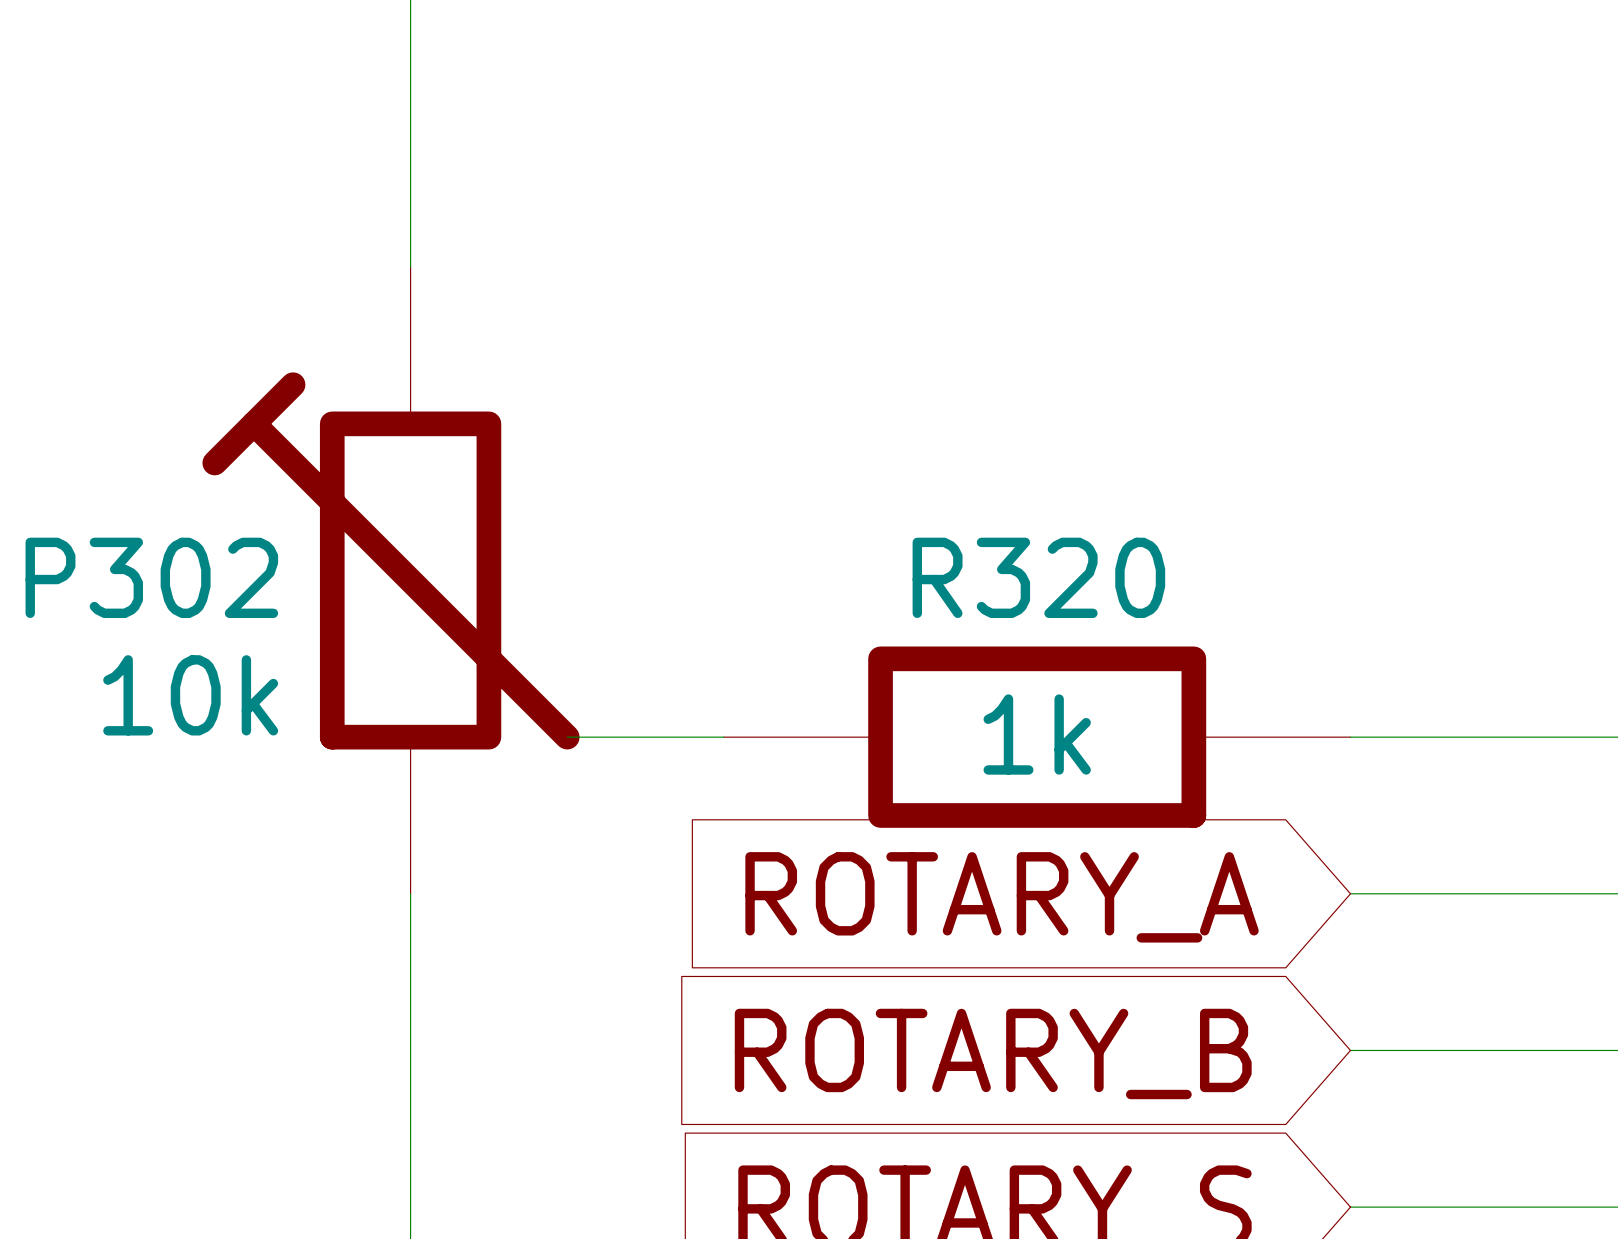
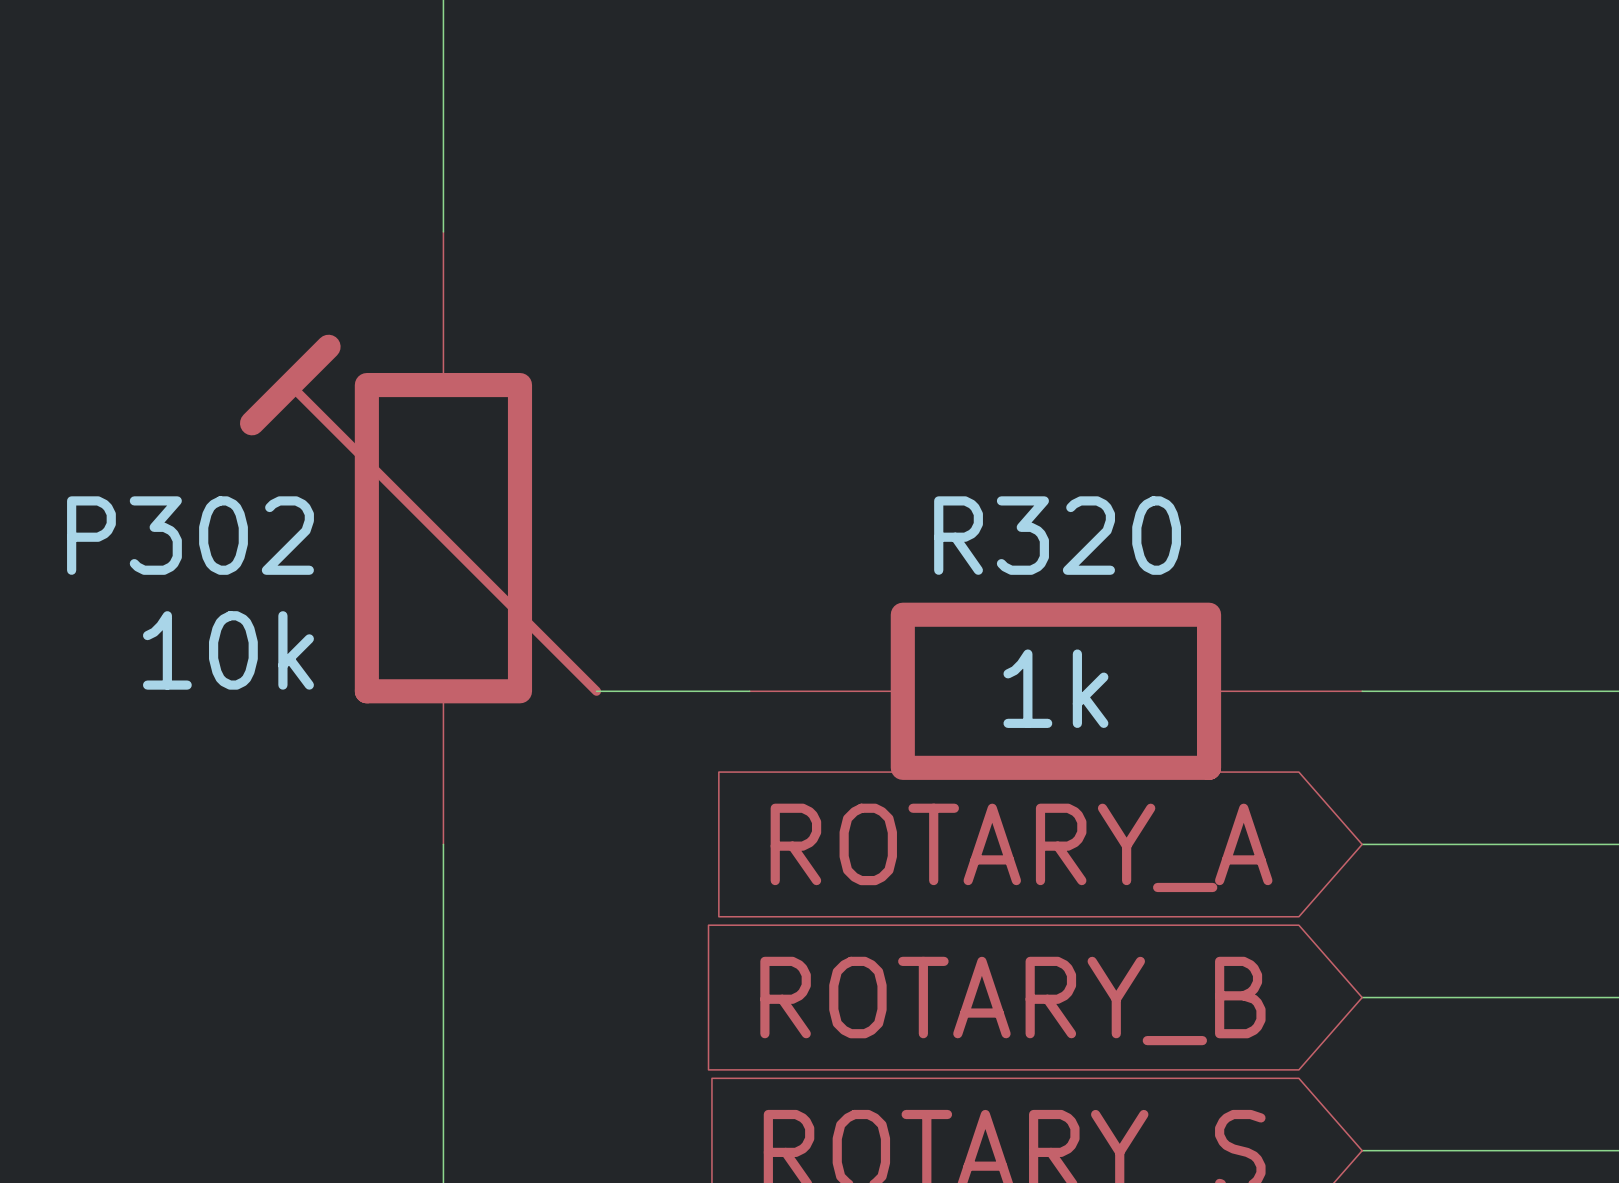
P302 symbol: [202, 267, 580, 894] -> [239, 231, 602, 845]

